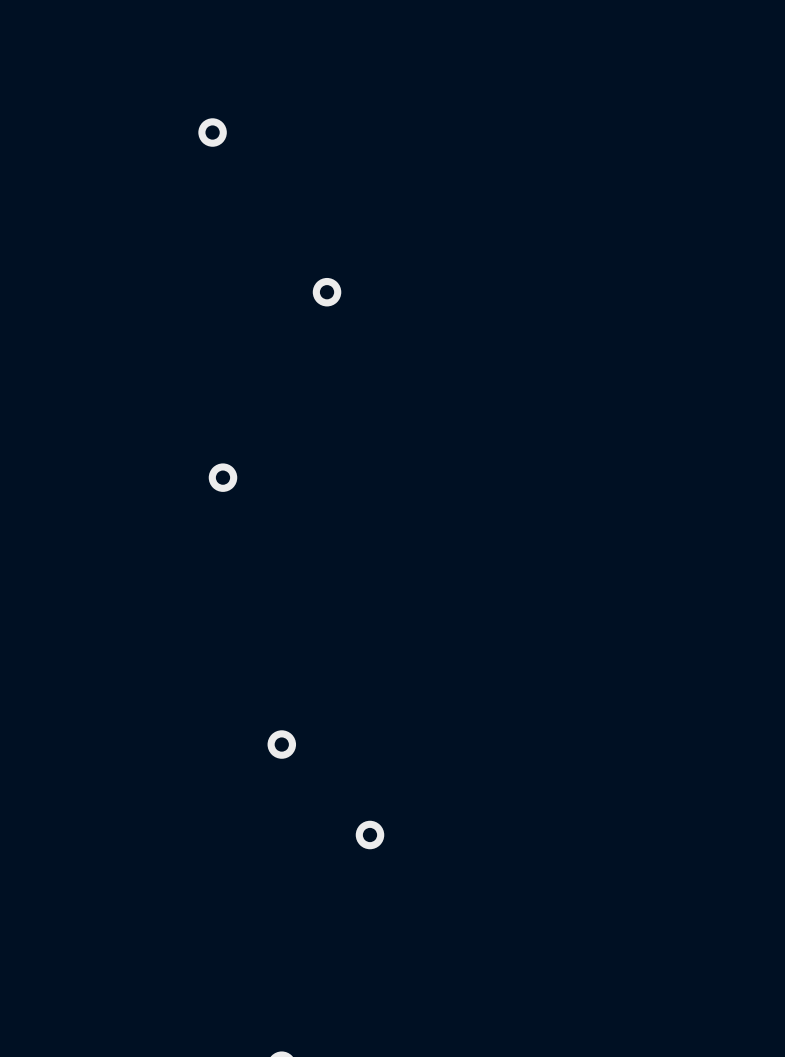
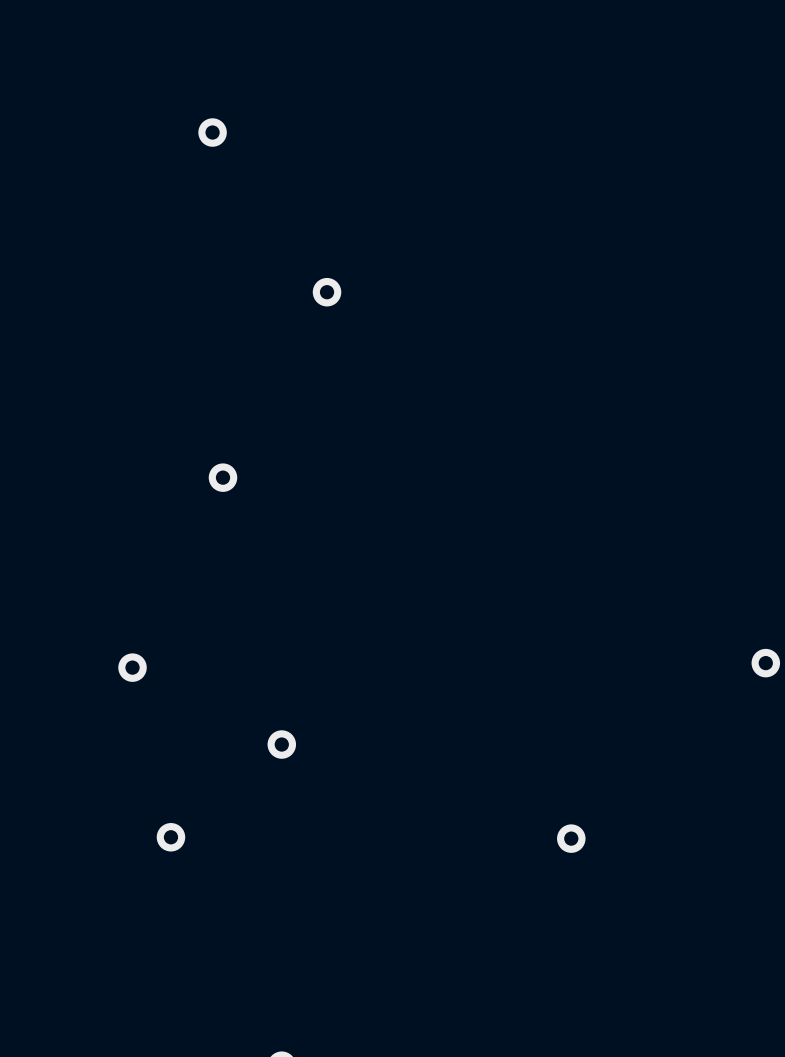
via: none -> (765, 663)
via: none -> (132, 667)
via: (370, 835) -> none
via: none -> (170, 837)
via: none -> (571, 838)

